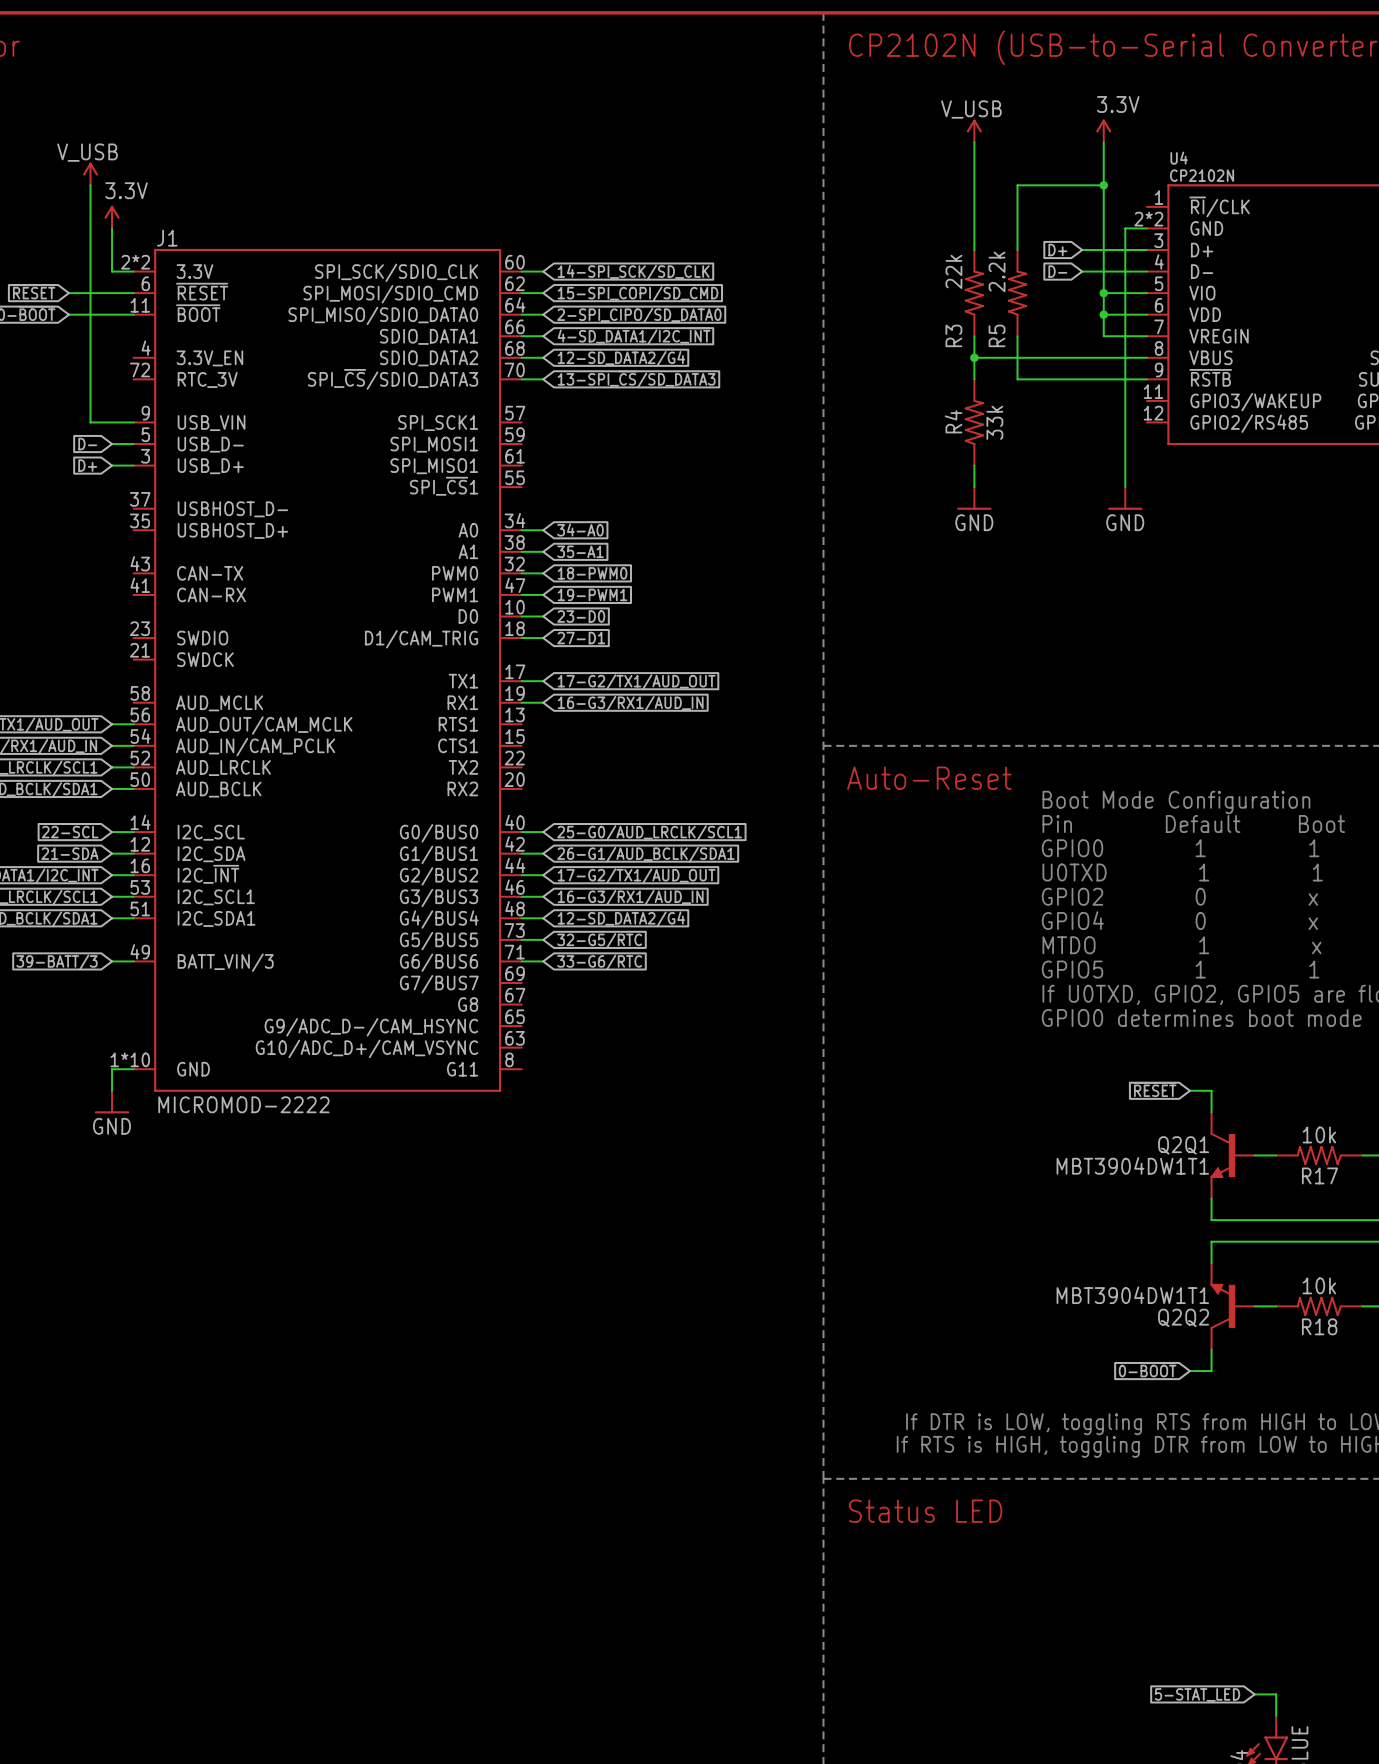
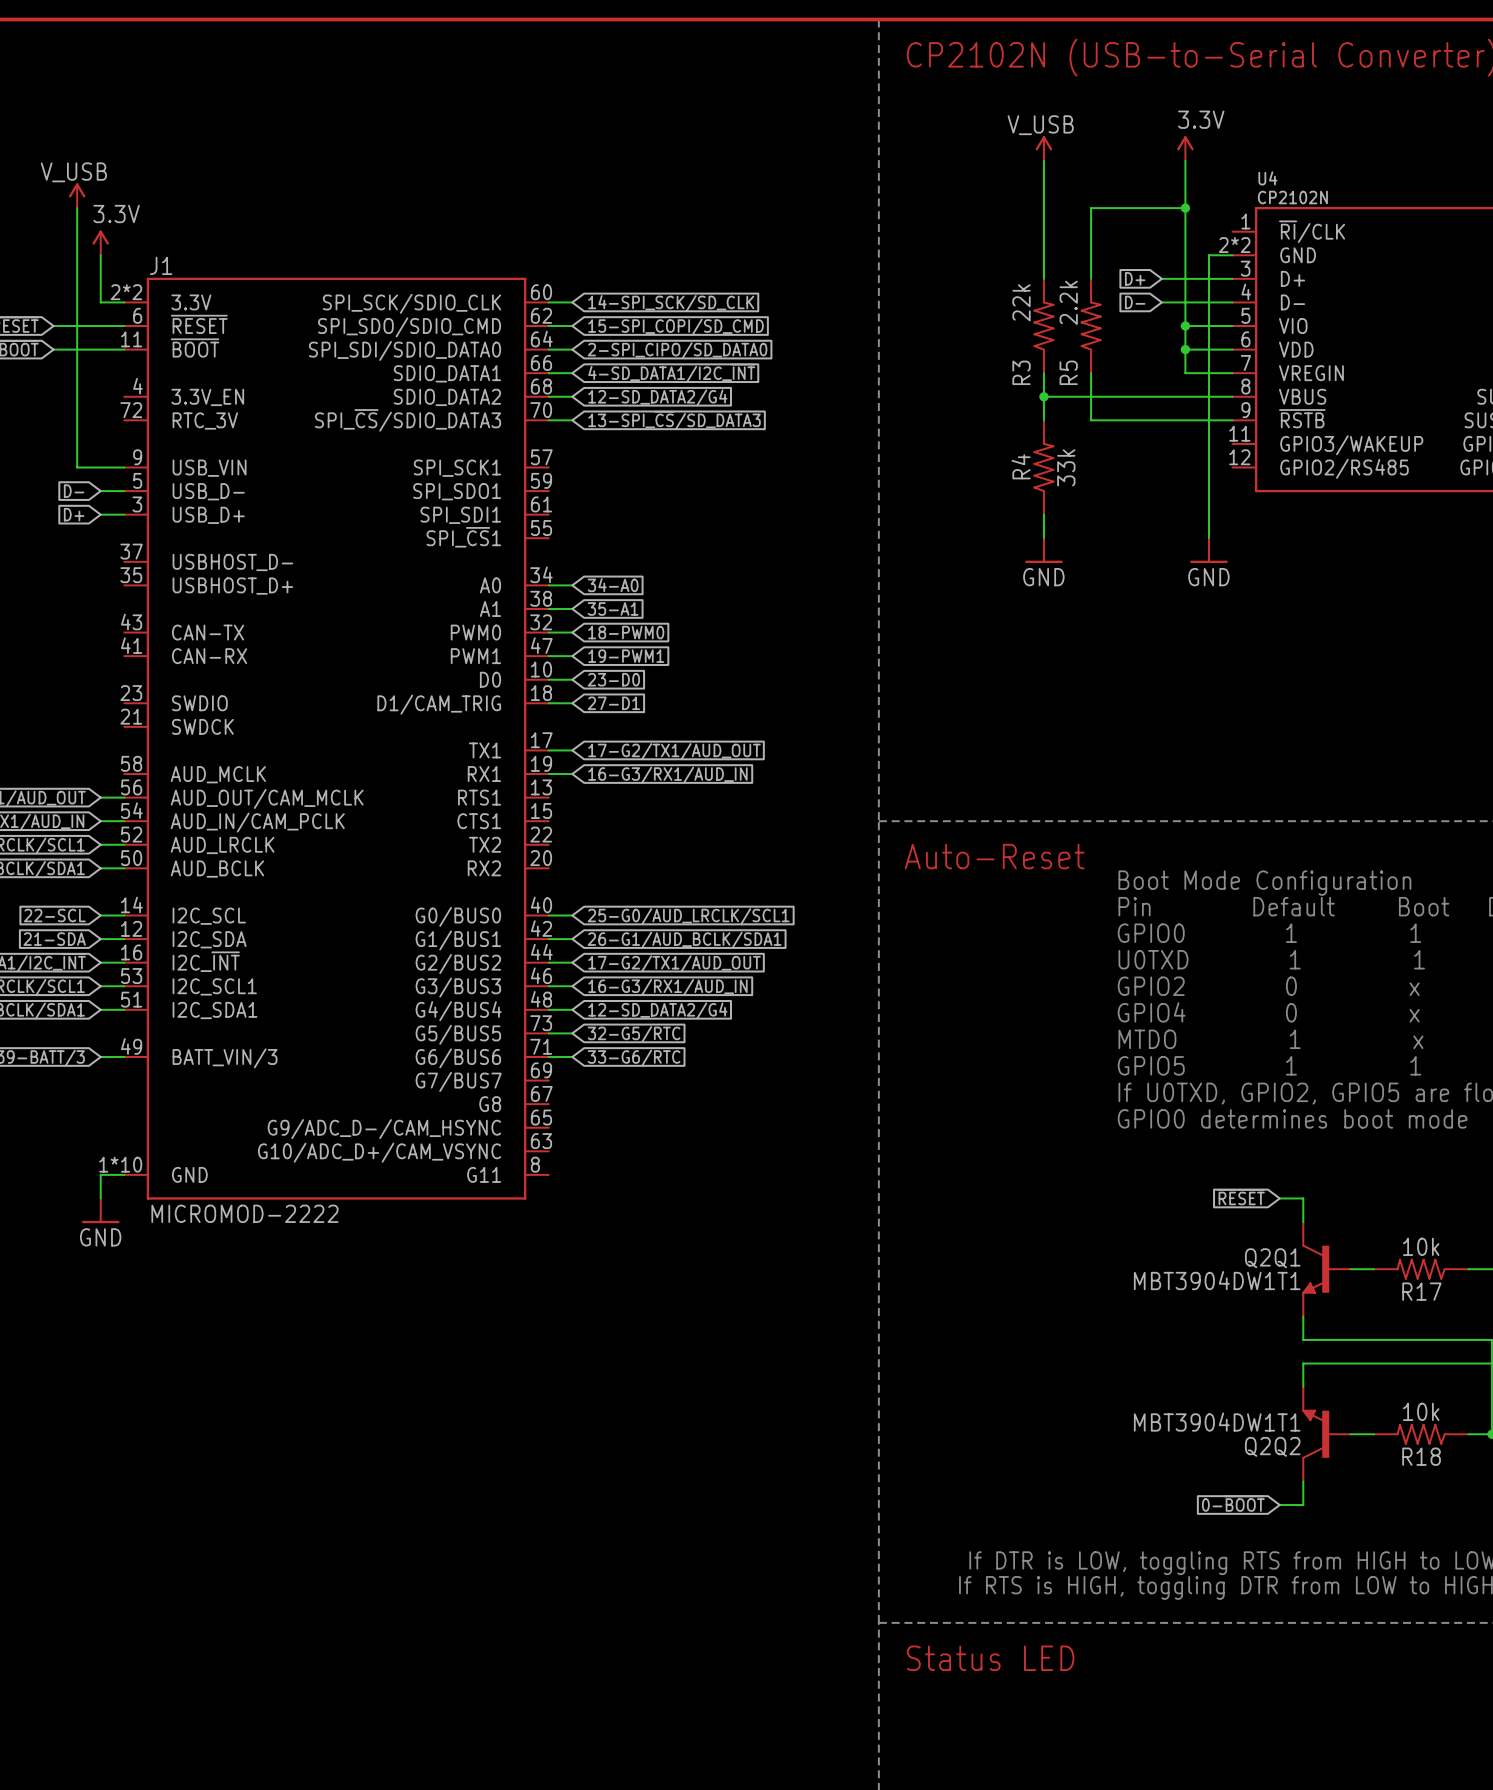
J1 pin name: SPI_MOSI/SDIO_CMD (390, 294) -> SPI_SDO/SDIO_CMD (409, 327)
J1 pin name: SPI_MISO/SDIO_DATA0 (383, 315) -> SPI_SDI/SDIO_DATA0 (404, 350)
J1 pin name: SPI_MOSI1 (434, 444) -> SPI_SDO1 (457, 491)
J1 pin name: SPI_MISO1 (434, 466) -> SPI_SDI1 (460, 515)

